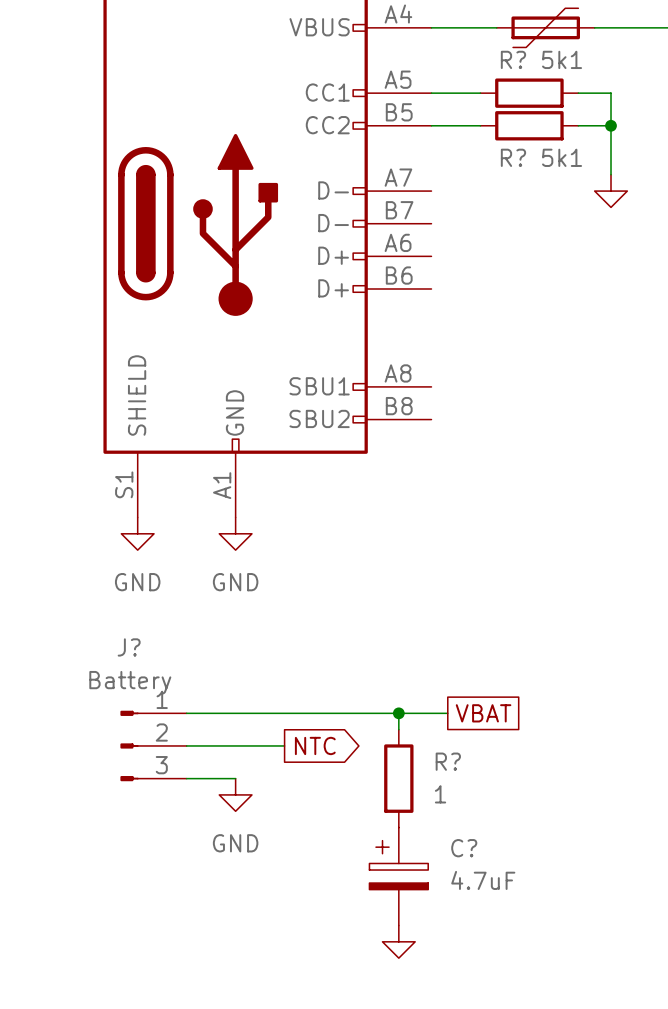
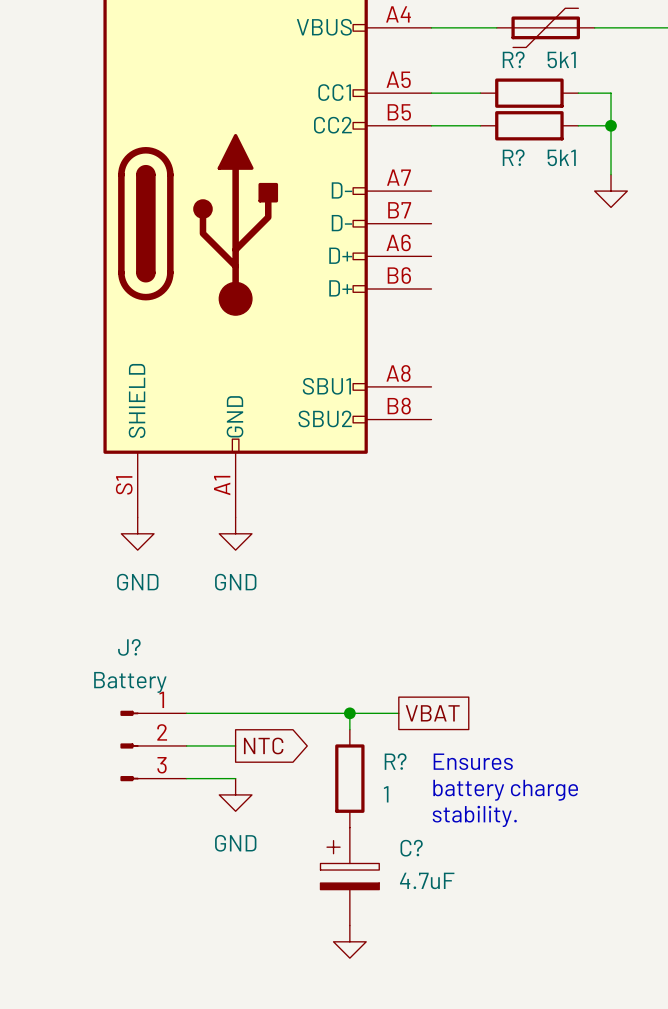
wire: none -> (349, 713) (349, 729)
junction position: (398, 713) -> (349, 713)
global label position: VBAT (483, 713) -> VBAT (432, 713)
wire: (235, 745) (284, 745) -> none
global label position: NTC (315, 745) -> NTC (263, 745)
text: none -> Ensures (473, 761)
R? position: (398, 778) -> (349, 778)
text: none -> battery charge (505, 790)
text: none -> stability. (474, 816)
C? position: (398, 876) -> (349, 876)
power symbol position: (398, 941) -> (349, 941)

